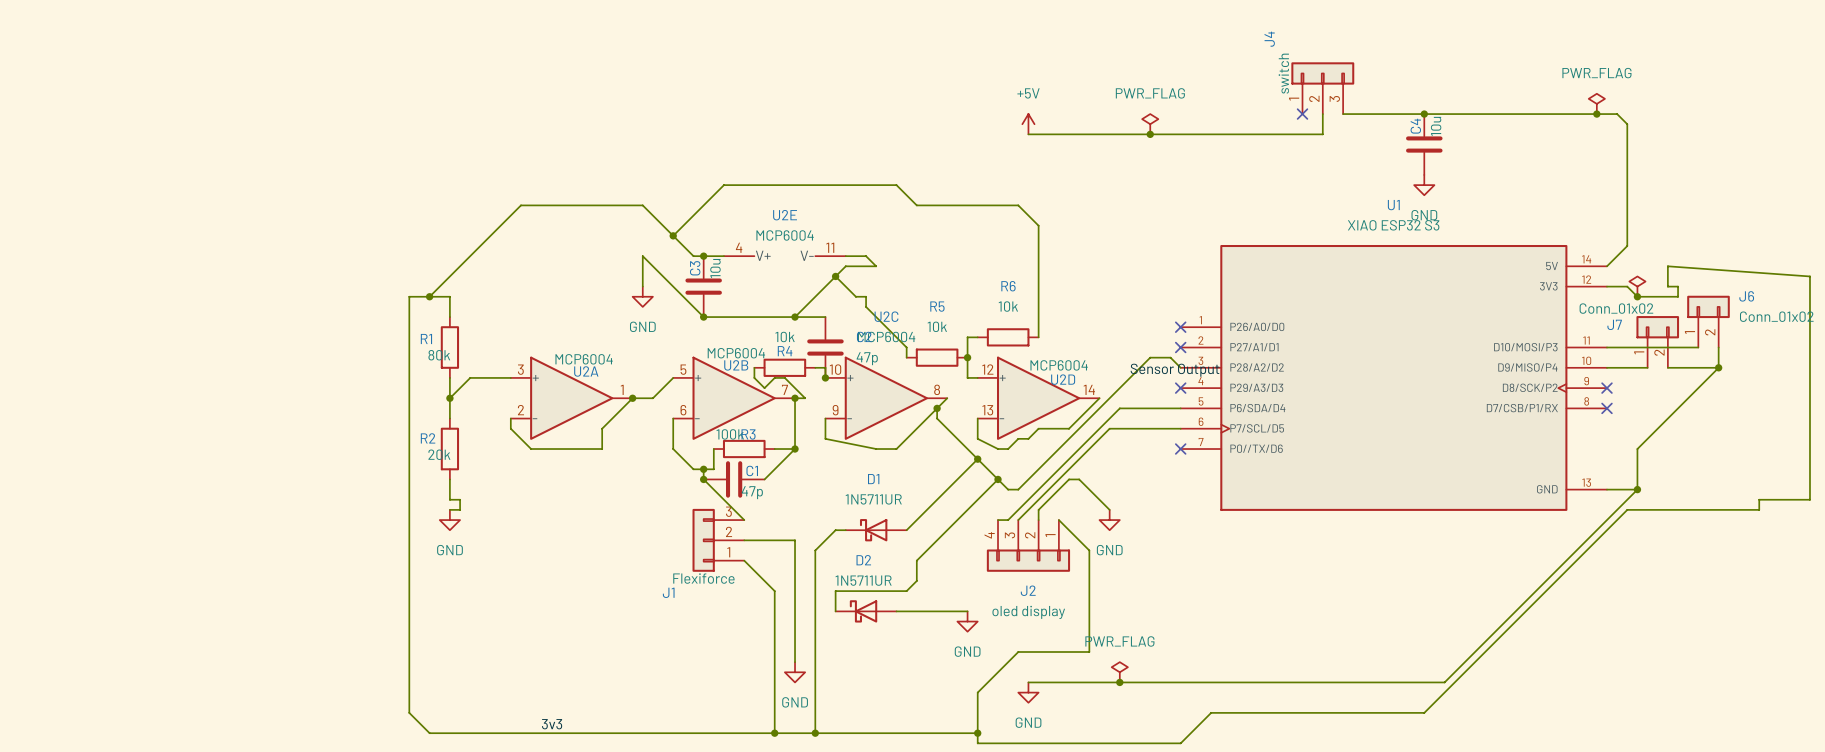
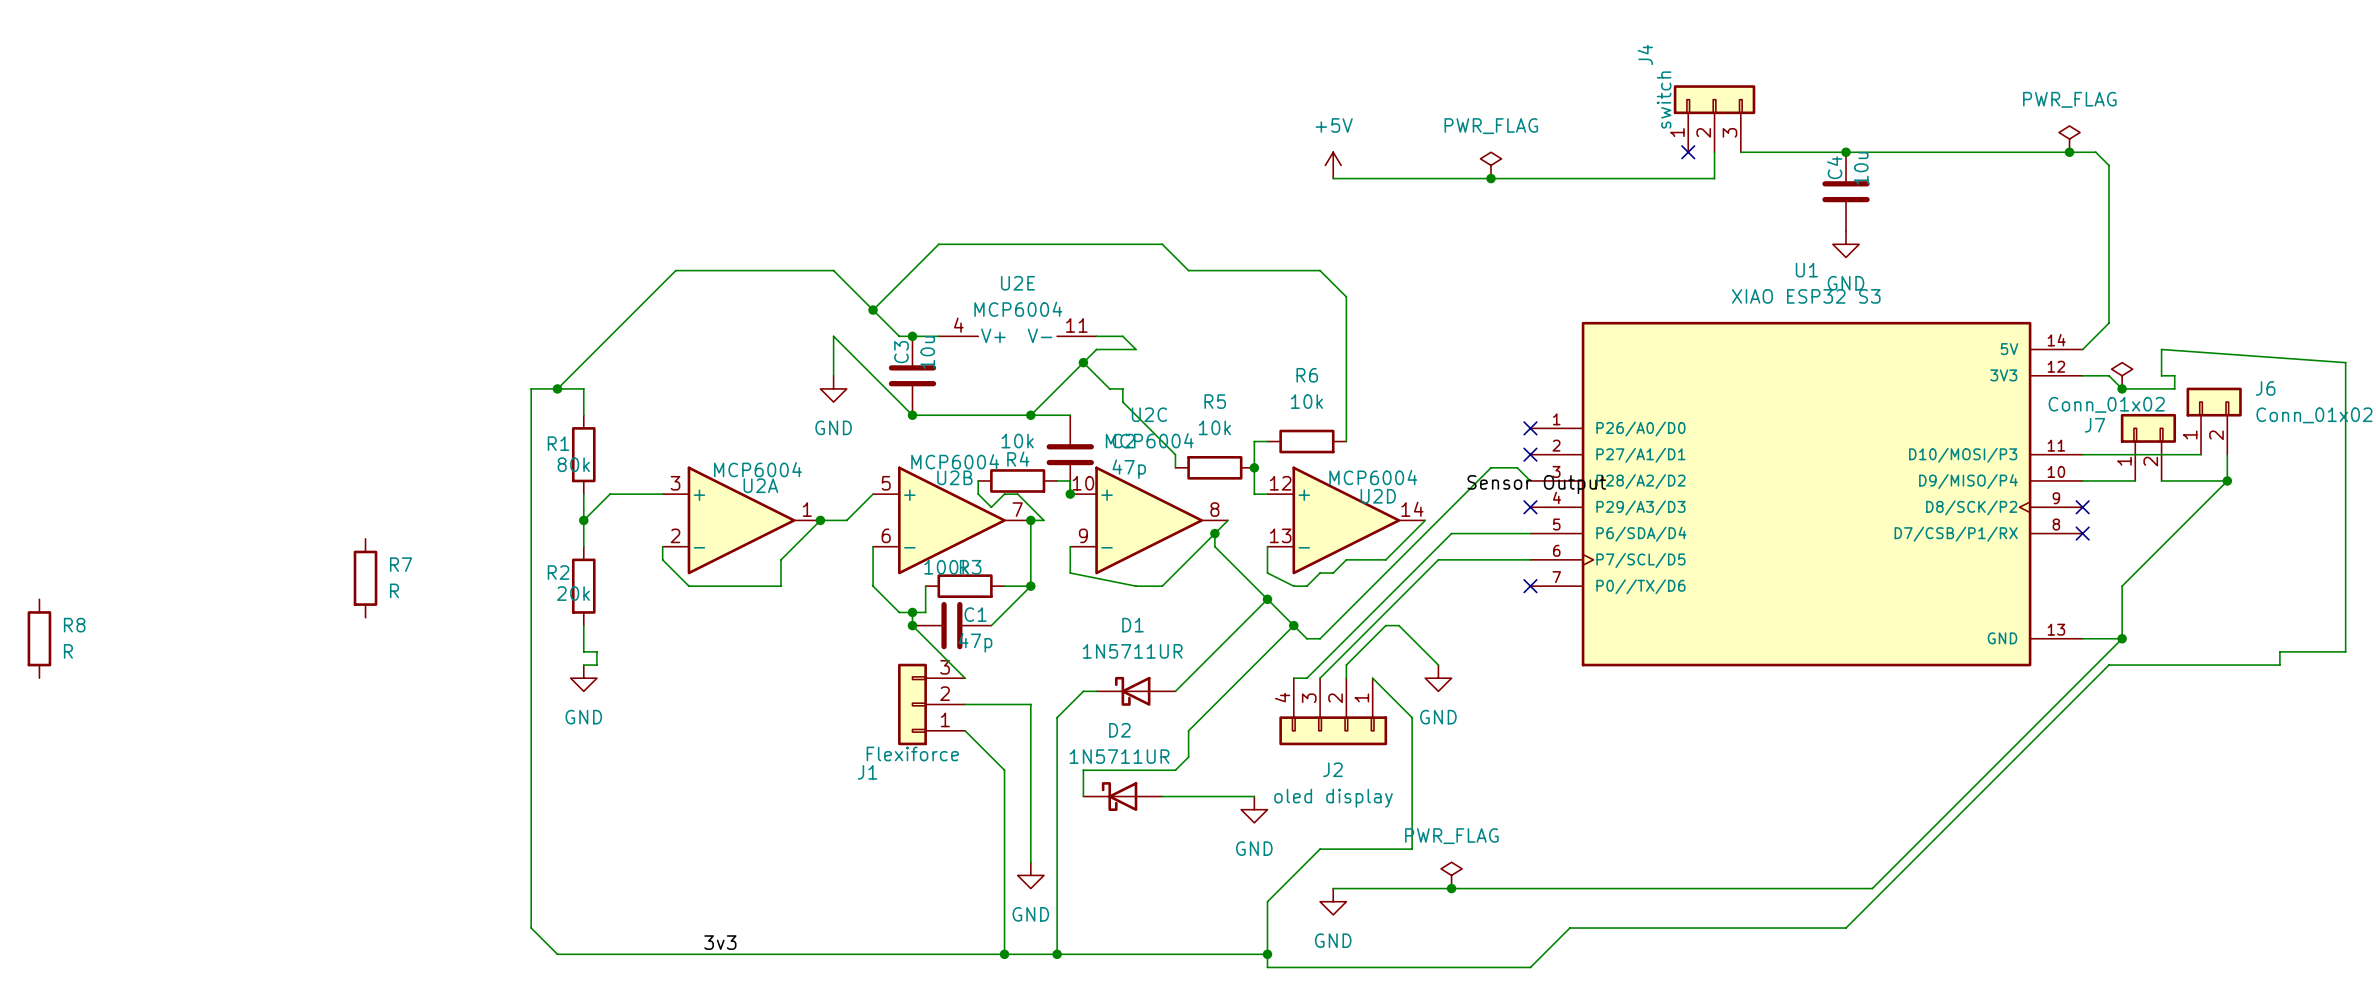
R7: none -> R (365, 578)
R8: none -> R (39, 638)

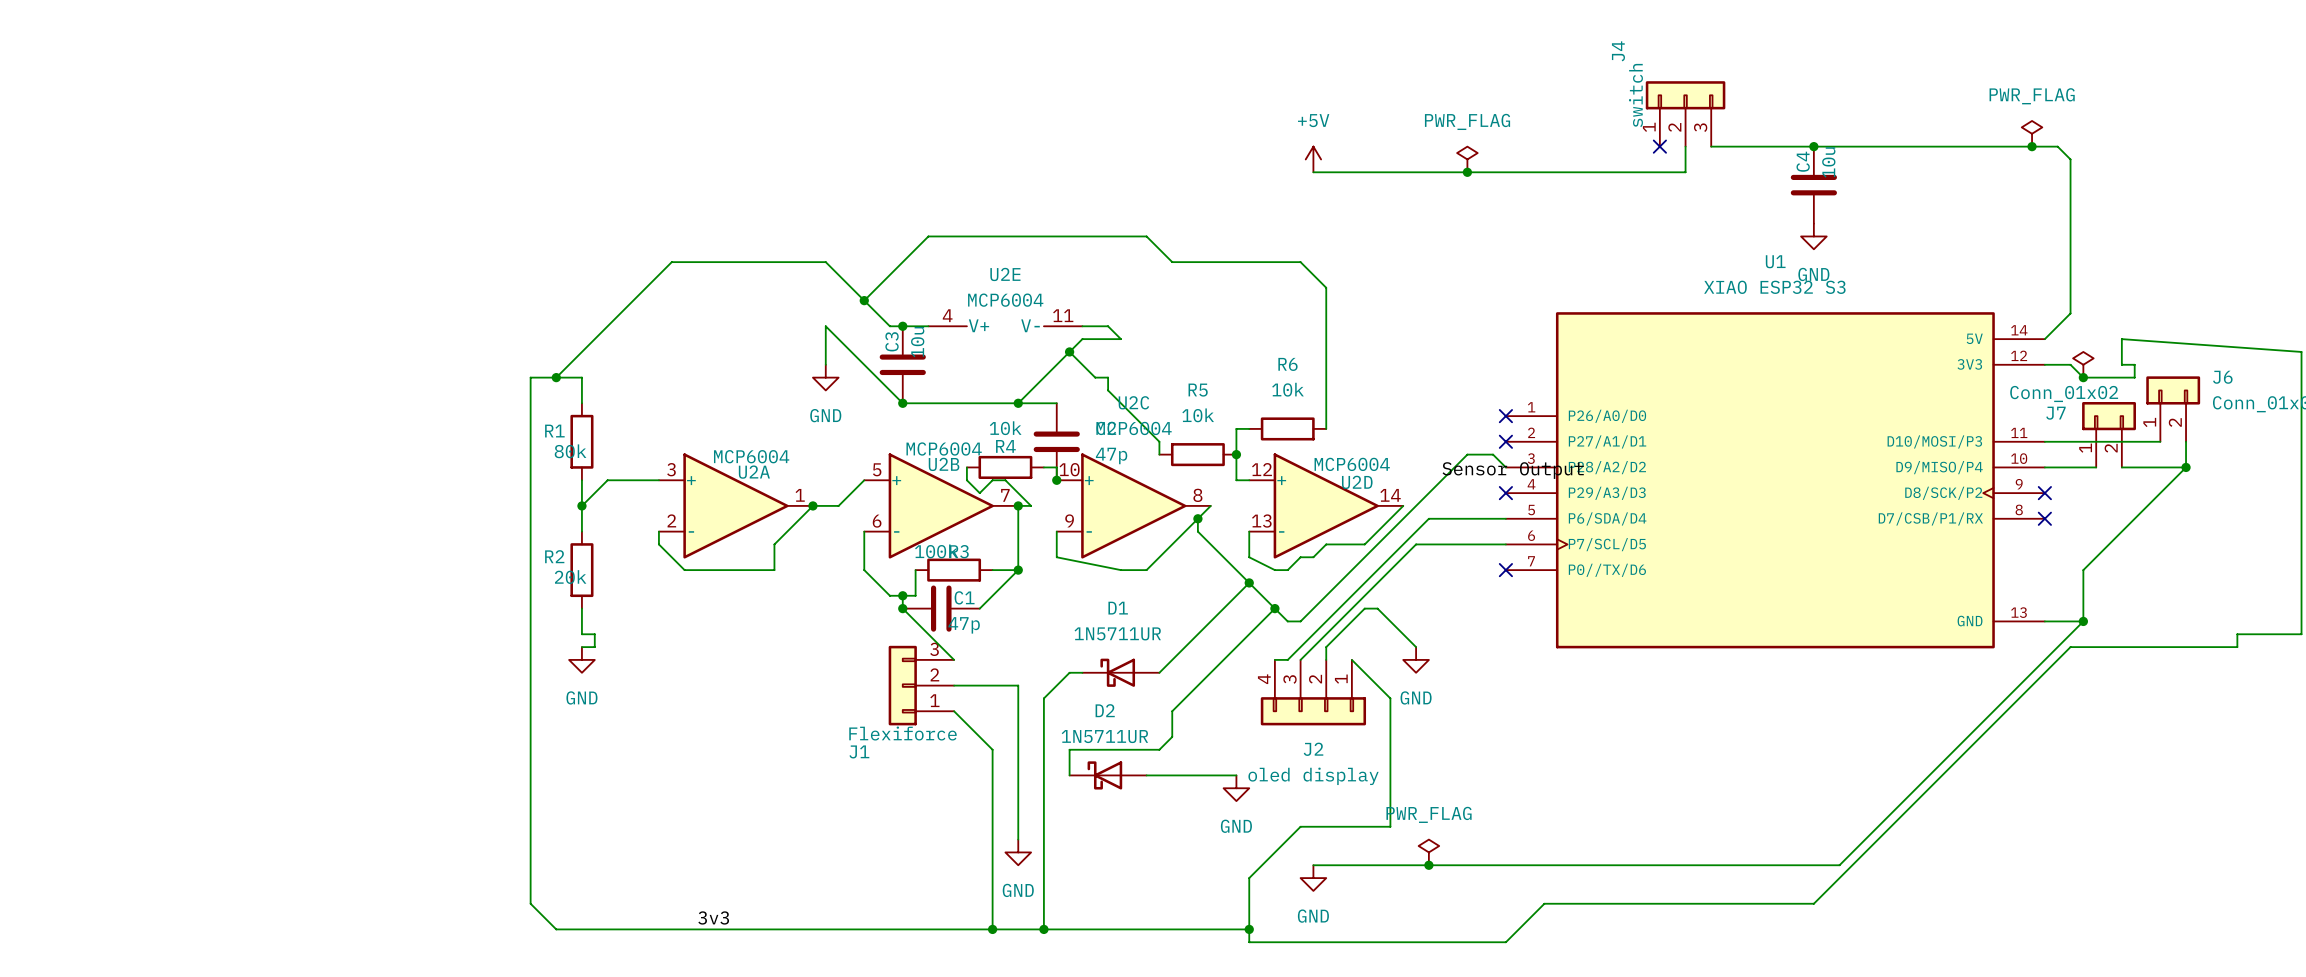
R7: R (365, 578) -> none
R8: R (39, 638) -> none

